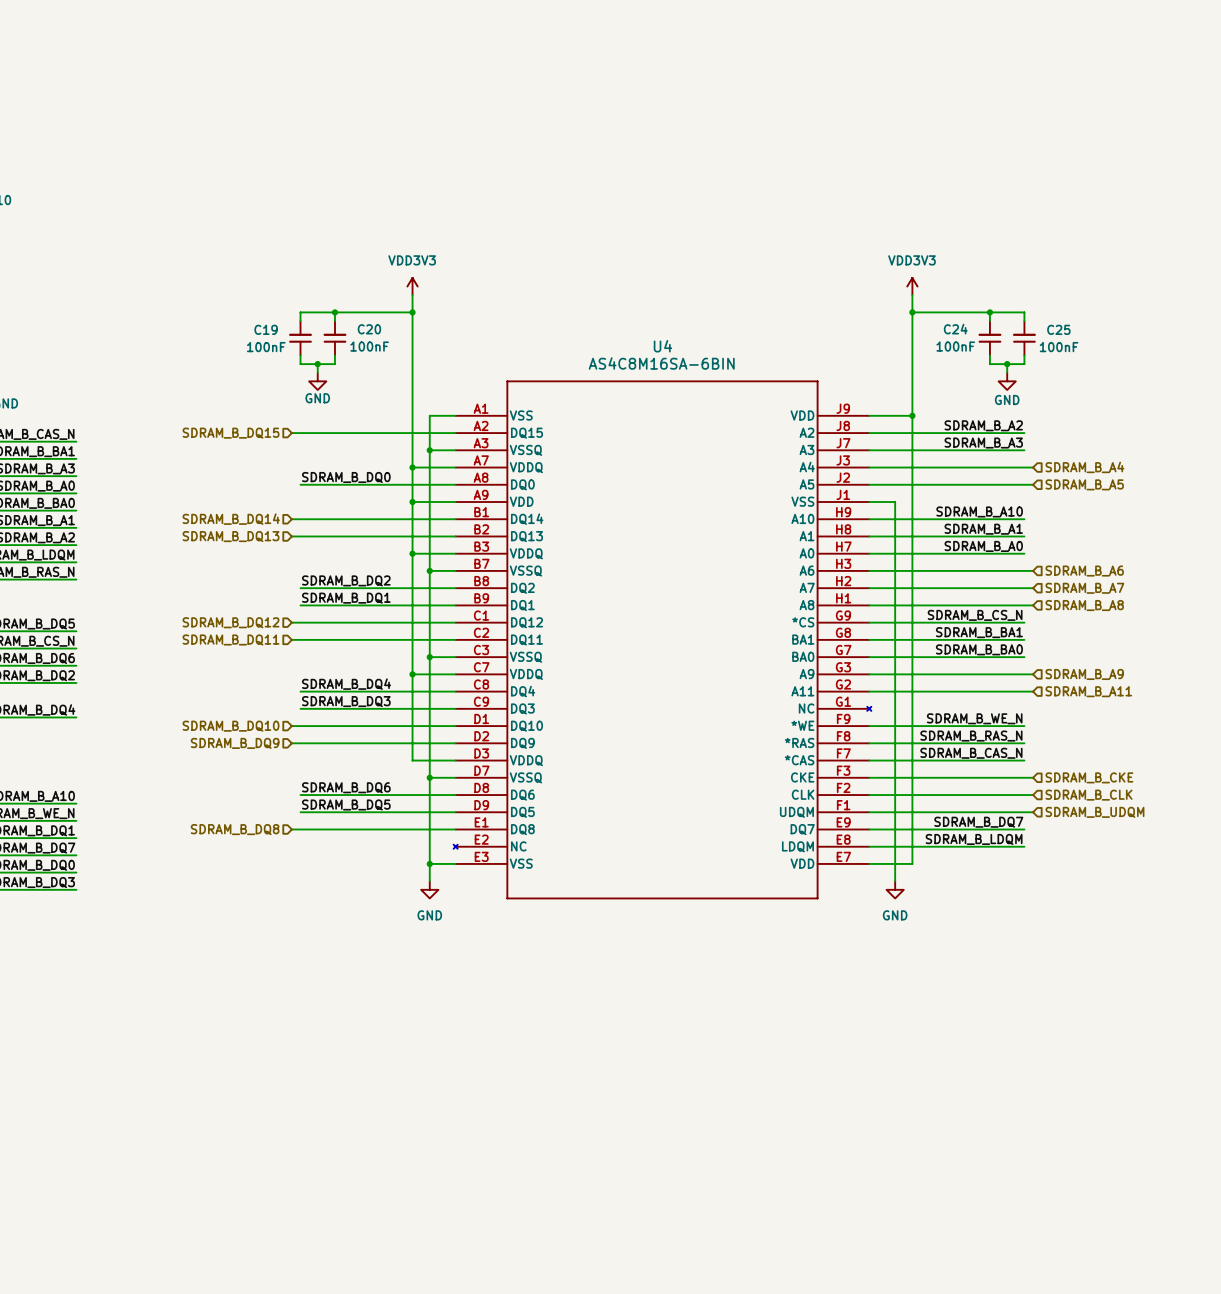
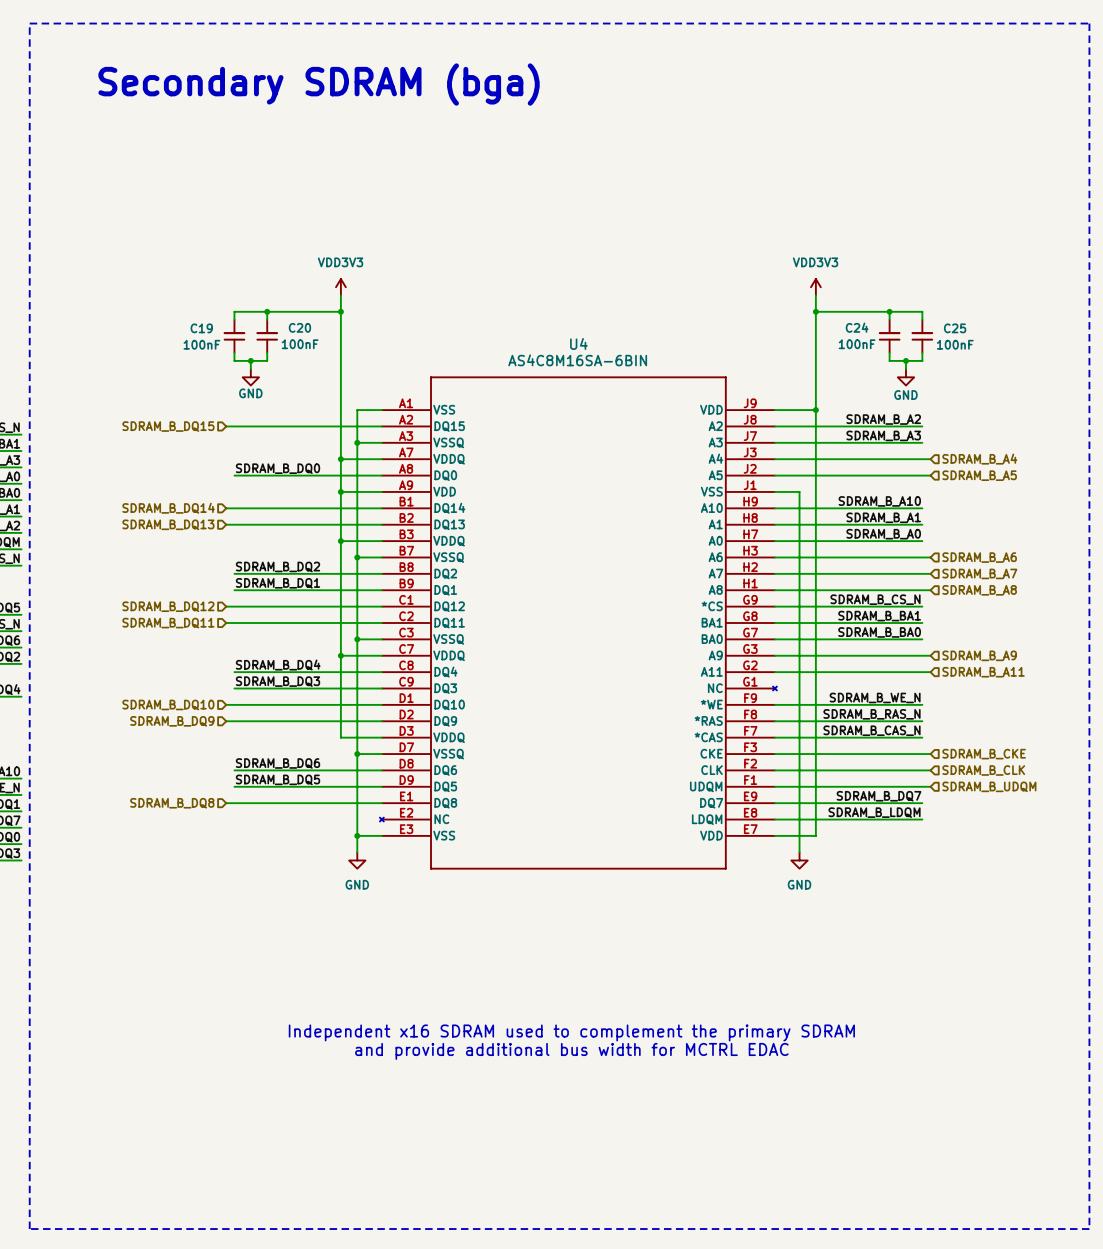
line: none -> (29, 23) (1089, 23) (1089, 1229) (29, 1229) (29, 23)
text: none -> Secondary SDRAM (bga) (319, 84)
text: none -> Independent x16 SDRAM used to complement the primary SDRAM (571, 1032)
text: none -> and provide additional bus width for MCTRL EDAC (571, 1051)

